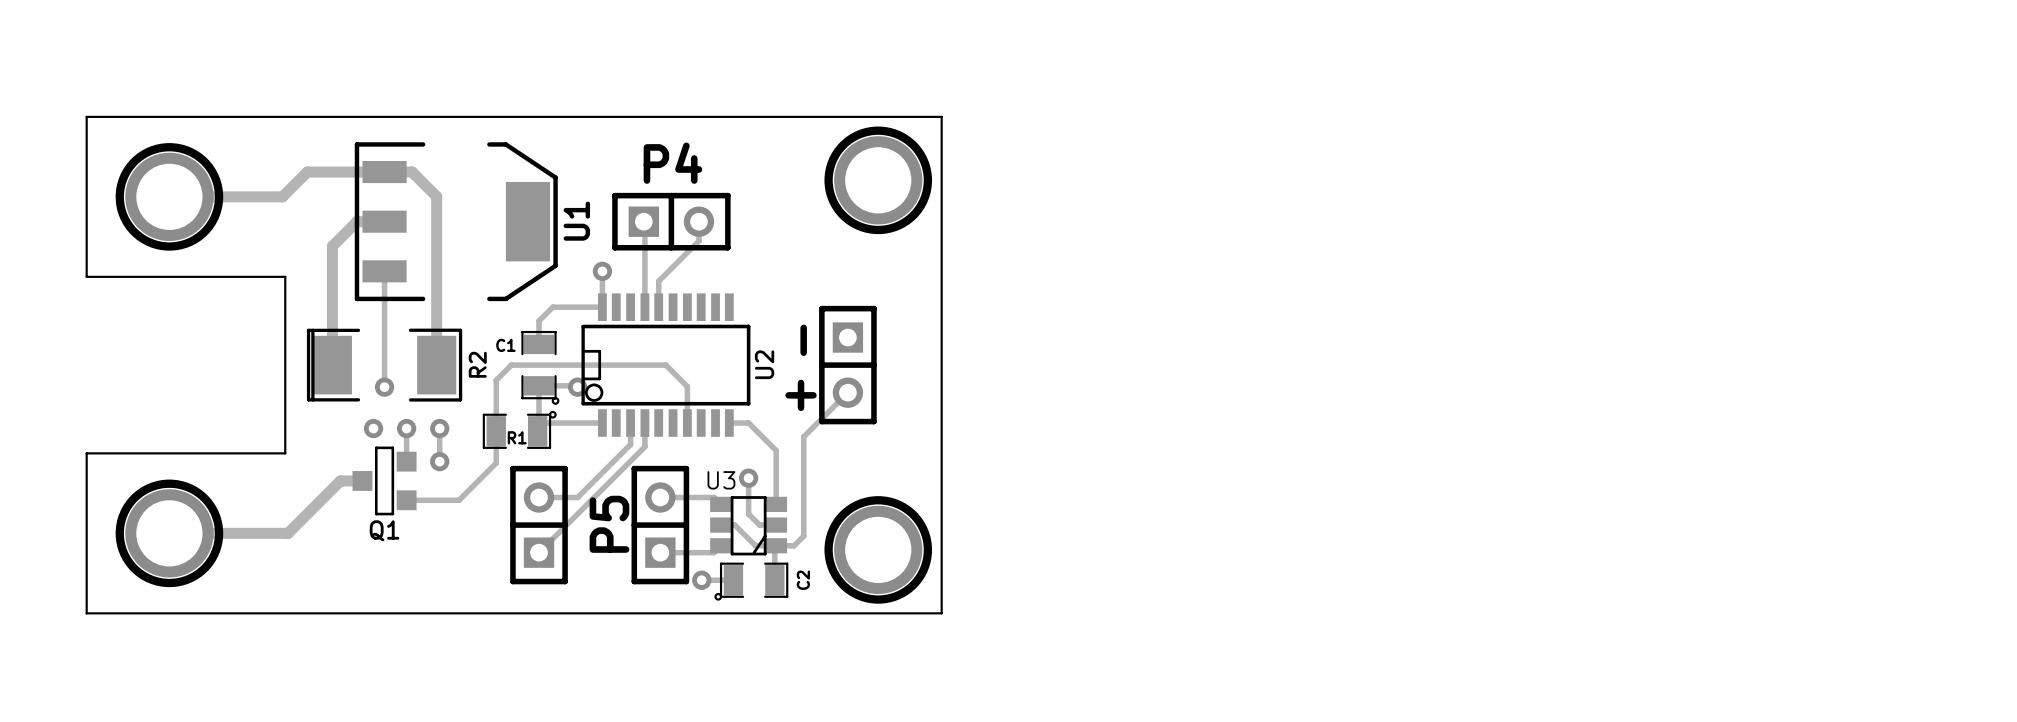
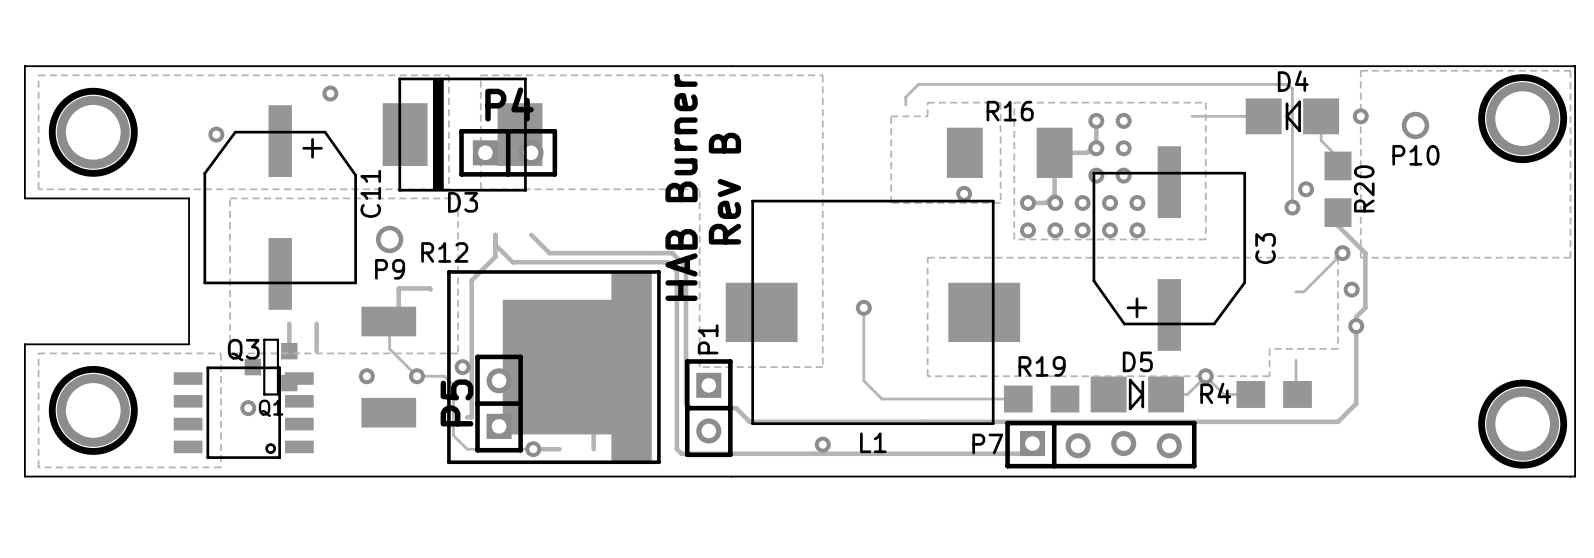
board edge: (941, 116) (941, 613) -> (731, 66) (1575, 66) (1575, 476) (731, 476)
zone outline: none -> (1360, 70) (1360, 257) (1570, 257) (1570, 70) (1360, 70)
zone outline: none -> (38, 75) (38, 189) (448, 189) (448, 75) (38, 75)
zone outline: none -> (480, 75) (822, 75) (822, 367) (699, 367) (699, 189) (480, 189) (480, 75)
via: none -> (330, 93)
zone outline: none -> (927, 102) (927, 116) (891, 116) (891, 202) (1000, 202) (1000, 102) (927, 102)
zone outline: none -> (1014, 102) (1205, 102) (1205, 239) (1014, 239) (1014, 102)
track: none -> (905, 104) (905, 97) (918, 84) (1287, 84) (1292, 88) (1292, 207)
track: none -> (1192, 116) (1263, 116)
D4: none -> (1292, 116)
track: none -> (1321, 116) (1321, 140) (1338, 157) (1338, 165)
via: none -> (1360, 116)
part: (878, 180) -> none
part: none -> (1522, 118)
track: none -> (1096, 120) (1096, 143) (1087, 152) (1054, 152) (1054, 194) (1046, 202) (1027, 202)
via: none -> (1096, 120)
via: none -> (1123, 120)
P10: none -> (1415, 125)
track: (169, 196) (282, 196) (307, 172) (412, 172) (436, 196) (436, 365) -> none
via: none -> (216, 134)
D3: none -> (462, 134)
via: none -> (1096, 148)
via: none -> (1123, 148)
track: (384, 221) (356, 221) (332, 246) (332, 365) -> none
U1: (456, 221) -> none
track: (643, 221) (644, 307) -> none
track: (698, 221) (698, 241) (658, 281) (658, 307) -> none
R16: none -> (1009, 152)
via: none -> (1096, 175)
via: none -> (1123, 175)
text: none -> HAB Burner (681, 187)
text: none -> Rev B (724, 188)
via: none -> (1306, 189)
R20: none -> (1338, 189)
track: (384, 271) (384, 387) -> none
track: (602, 271) (602, 307) (552, 307) (539, 320) (539, 344) -> none
via: (602, 271) -> none
via: none -> (964, 193)
zone outline: none -> (230, 198) (230, 353) (458, 353) (458, 198) (230, 198)
via: none -> (1027, 202)
via: none -> (1055, 202)
via: none -> (1082, 202)
via: none -> (1110, 202)
via: none -> (1137, 202)
C11: none -> (280, 207)
via: none -> (1292, 207)
track: none -> (1338, 212) (1338, 225) (1365, 253) (1365, 307) (1356, 316) (1356, 403) (1338, 421) (749, 421) (736, 408) (690, 408) (686, 403) (686, 266) (672, 253) (549, 253) (531, 234)
via: none -> (1027, 230)
via: none -> (1055, 230)
via: none -> (1082, 230)
via: none -> (1110, 230)
via: none -> (1137, 230)
track: none -> (495, 234) (495, 256) (471, 280) (471, 417) (467, 417)
P9: none -> (389, 239)
track: none -> (495, 244) (512, 262) (667, 262) (676, 271) (676, 449) (681, 453) (1022, 453) (1032, 443)
C3: none -> (1169, 248)
text: - (803, 340) -> none
track: none -> (1342, 253) (1303, 291) (1296, 291)
via: none -> (1342, 253)
zone outline: none -> (927, 257) (927, 376) (1269, 376) (1269, 348) (1338, 348) (1338, 257) (927, 257)
R2: (384, 365) -> none
U2: (665, 365) -> none
part: (847, 365) -> none
C1: (540, 367) -> none
via: (384, 387) -> none
via: (577, 387) -> none
via: none -> (1351, 289)
track: (847, 392) (803, 436) (803, 536) (794, 545) (755, 545) (734, 525) (721, 525) -> none
text: + (801, 395) -> none
track: none -> (863, 307) (863, 380) (882, 399) (1018, 399)
via: none -> (863, 307)
L1: none -> (872, 312)
track: (602, 423) (545, 423) (537, 431) -> none
track: (630, 423) (630, 444) (577, 497) (539, 497) -> none
track: (644, 423) (644, 446) (539, 552) -> none
track: (687, 423) (687, 386) (665, 365) (511, 365) (496, 380) (496, 463) (459, 500) (406, 500) -> none
track: (729, 423) (748, 423) (776, 450) (776, 504) -> none
track: none -> (394, 321) (388, 321) (389, 348) (417, 376) (444, 376) (453, 385) (453, 435) (467, 449) (526, 449)
via: (373, 428) -> none
via: (406, 428) -> none
via: (439, 428) -> none
R1: (519, 429) -> none
via: none -> (1356, 326)
via: (439, 461) -> none
zone outline: none -> (38, 353) (38, 467) (220, 467) (220, 353) (38, 353)
track: none -> (1296, 360) (1297, 394)
track: (748, 478) (748, 514) (759, 525) (776, 525) -> none
via: (748, 478) -> none
track: (362, 480) (340, 480) (288, 533) (169, 533) -> none
via: none -> (462, 367)
R12: none -> (511, 367)
via: none -> (366, 376)
via: none -> (417, 376)
via: none -> (1205, 376)
track: (660, 497) (714, 497) (721, 504) -> none
D5: none -> (1137, 394)
track: none -> (1166, 394) (1187, 394) (1205, 376) (1224, 394) (1250, 394)
R4: none -> (1274, 394)
R19: none -> (1041, 399)
part: (539, 525) -> none
U3: (748, 525) -> none
via: none -> (248, 408)
P1: none -> (708, 408)
Q3: none -> (243, 412)
track: (721, 545) (714, 552) (660, 552) -> none
part: (878, 549) -> none
part: none -> (1522, 424)
via: none -> (822, 444)
P7: none -> (1100, 444)
C2: (751, 581) -> none

